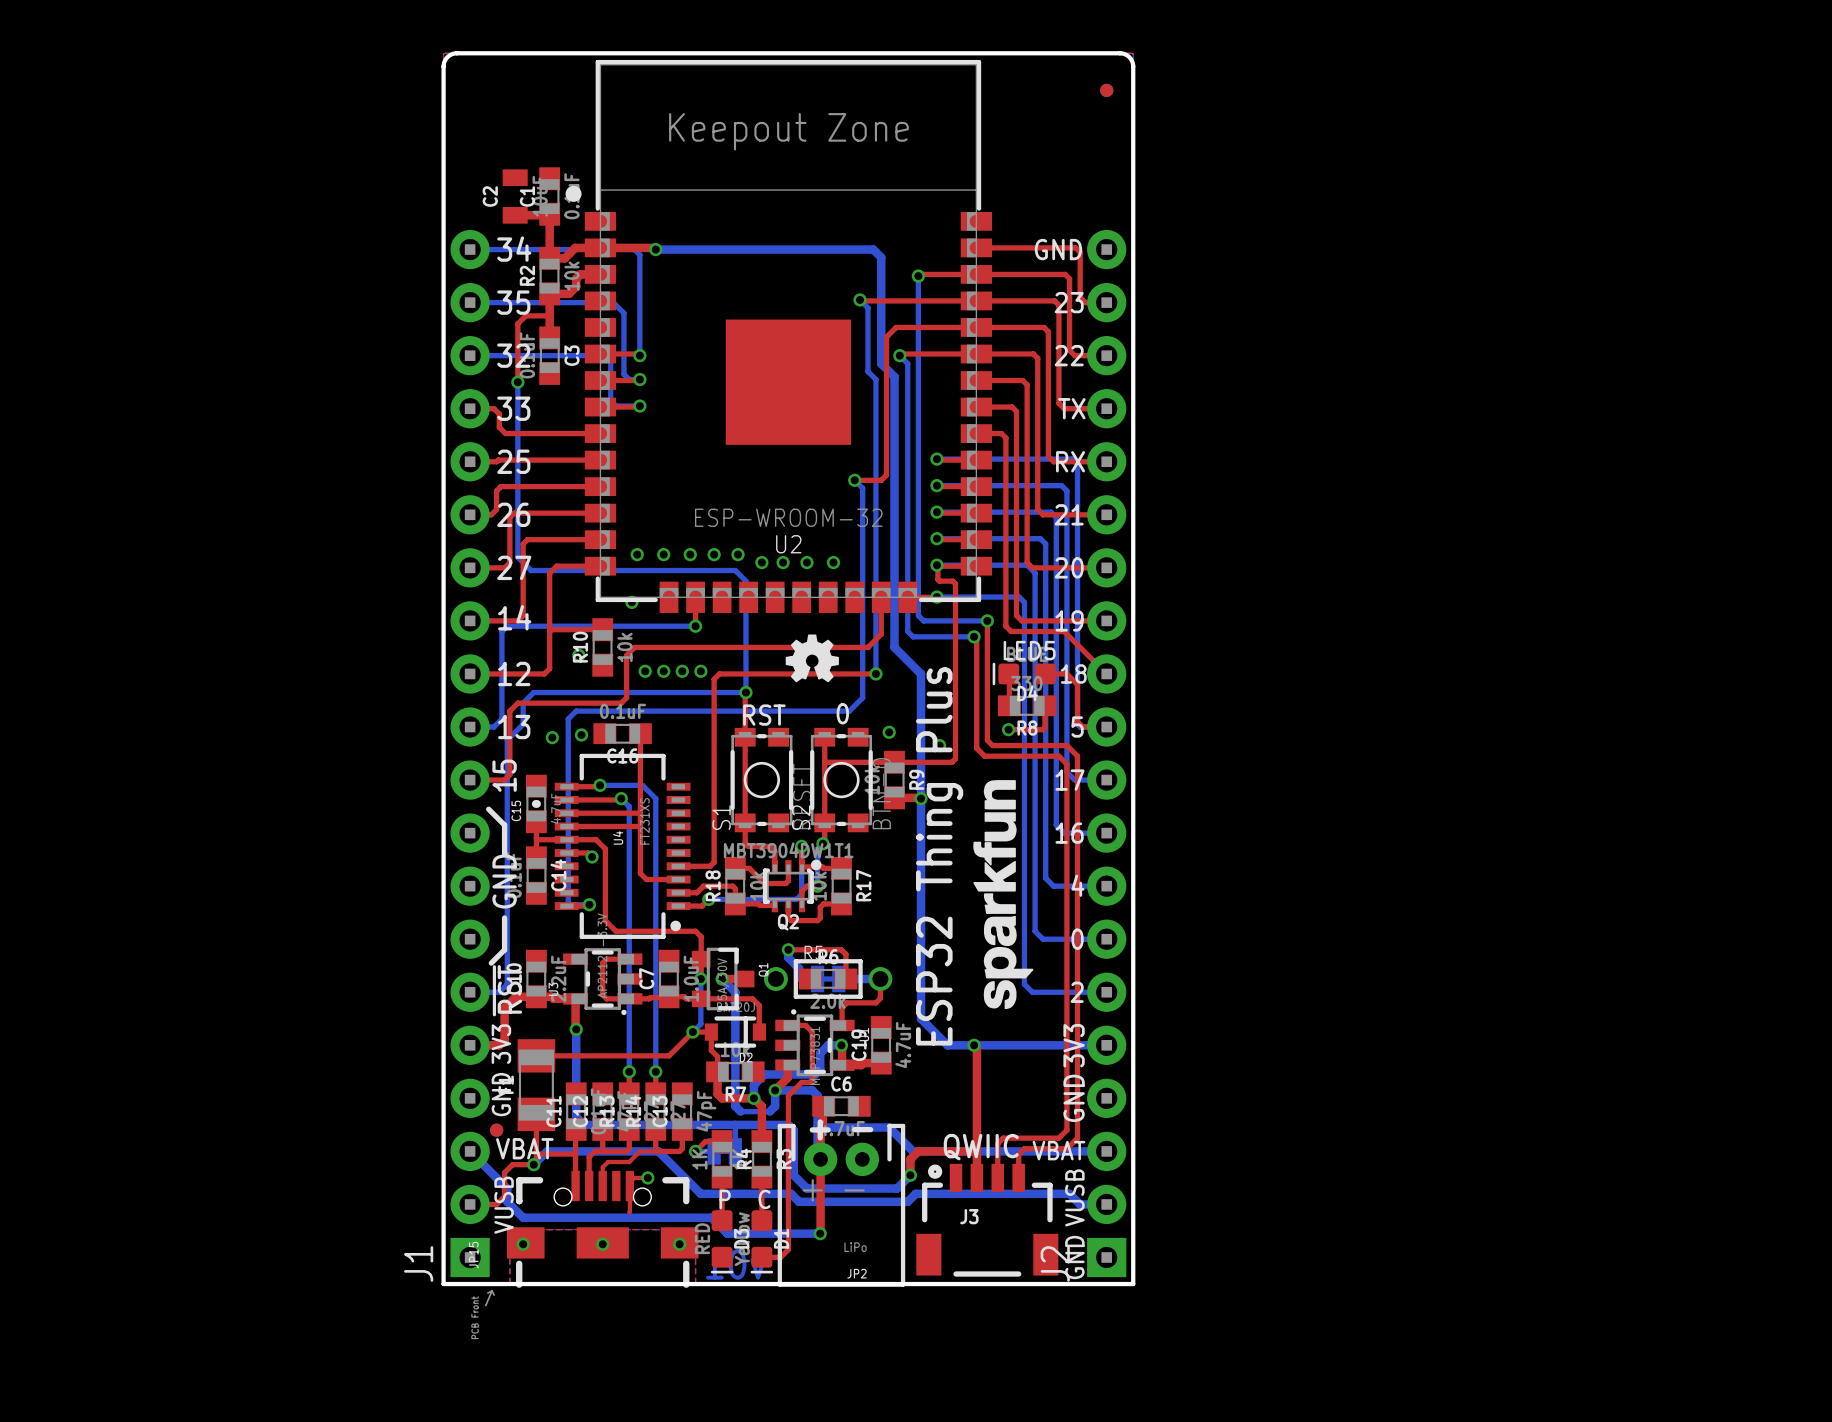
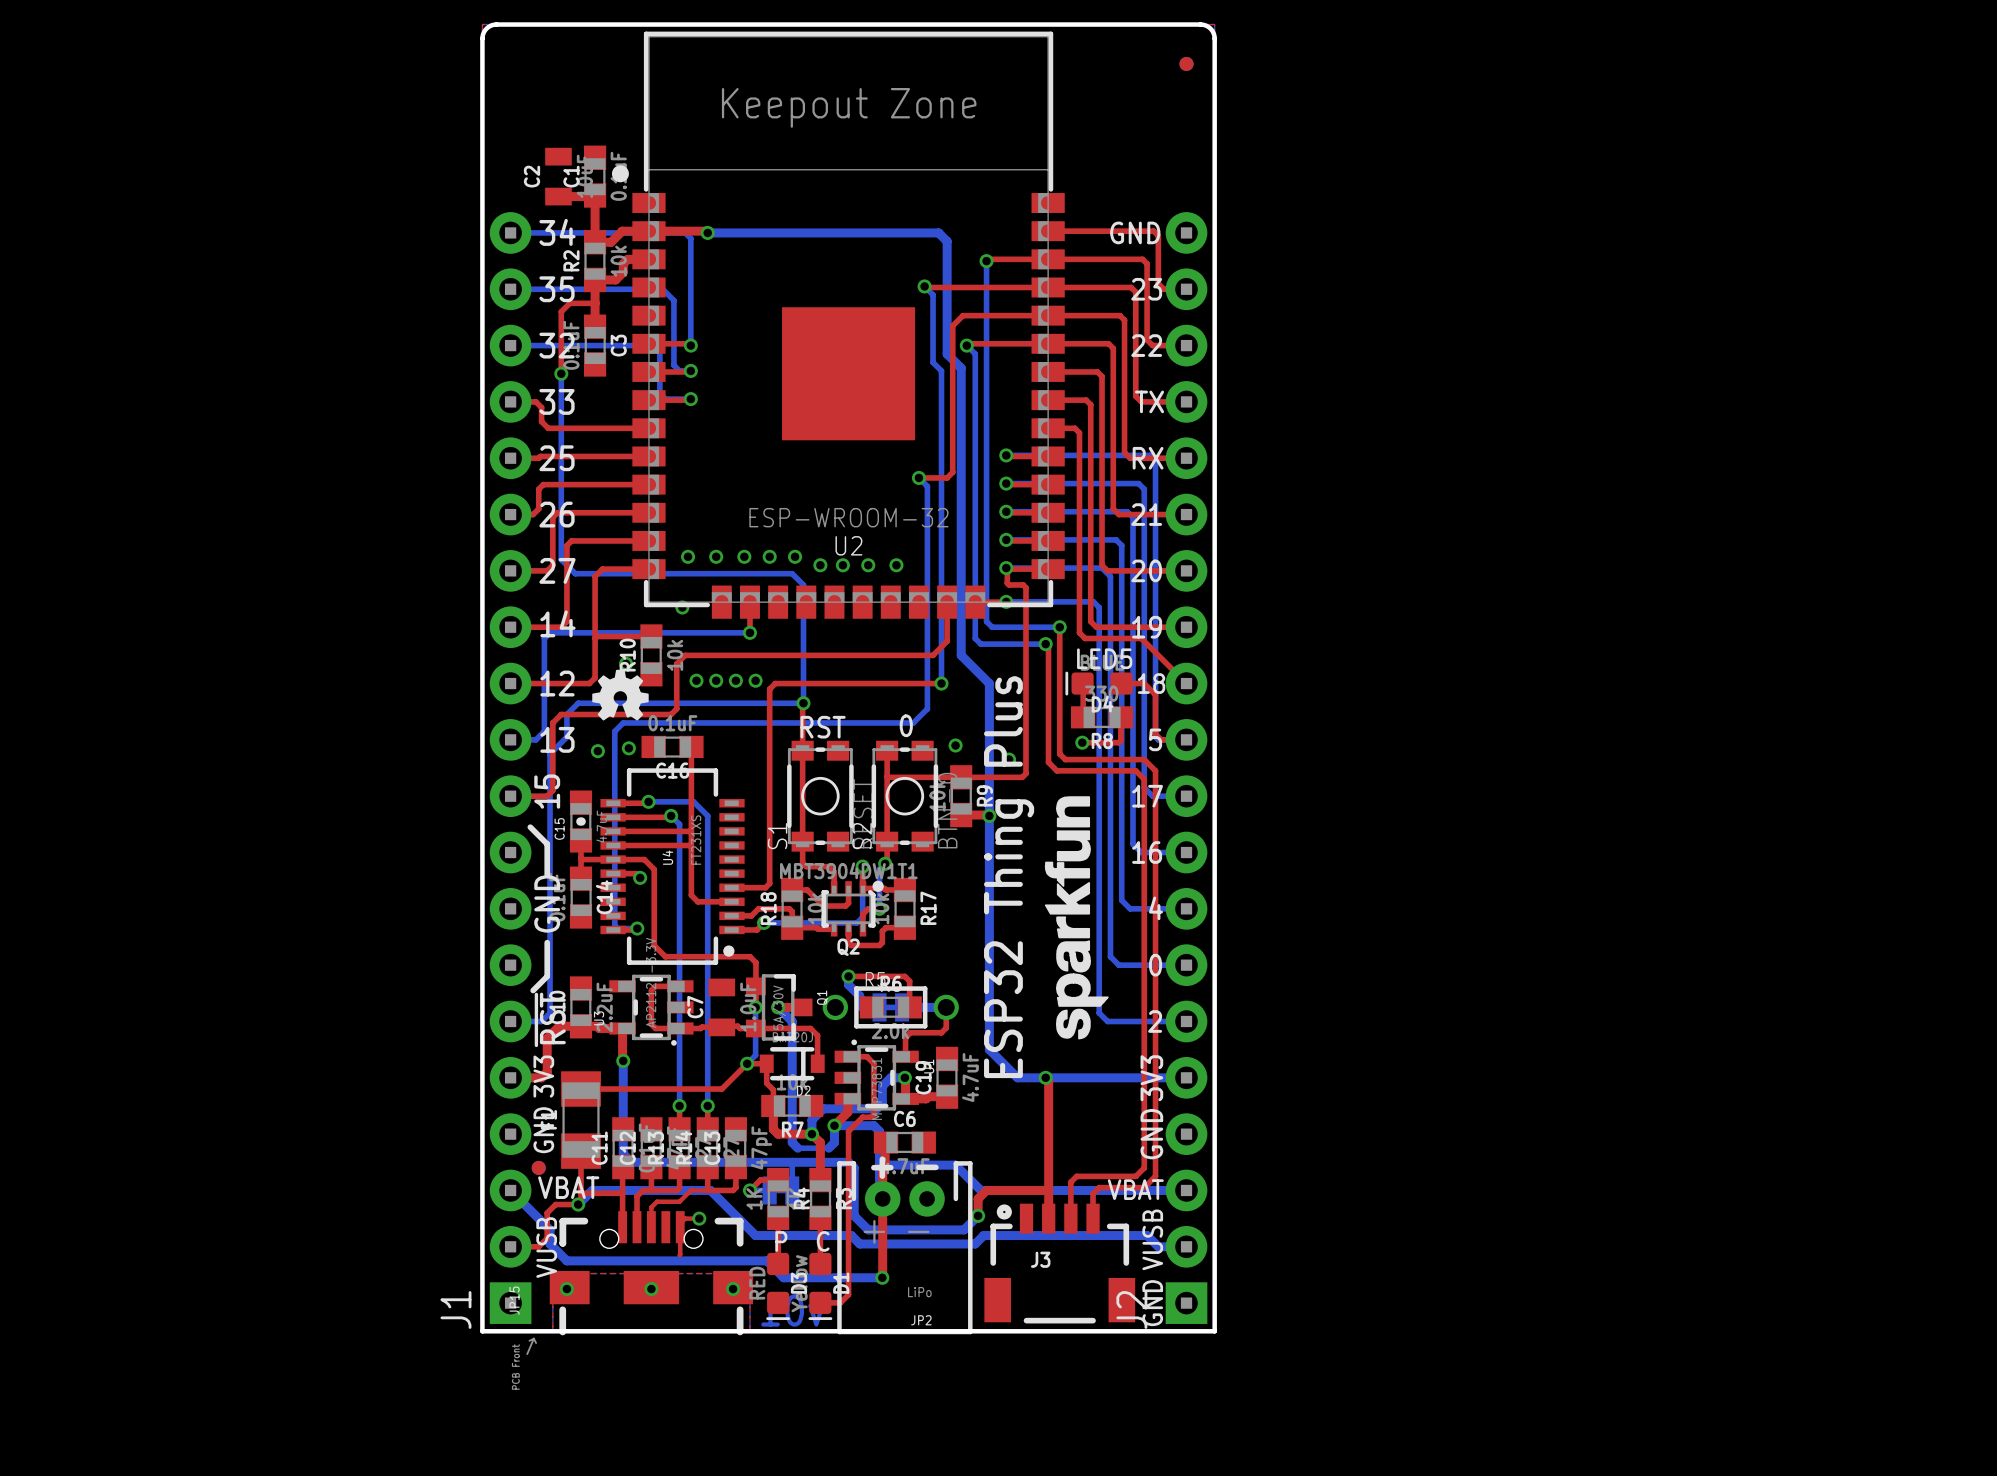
drawing position: (812, 658) -> (620, 695)
C7 footprint: [658, 949, 680, 1009] -> [708, 978, 736, 1037]
text: QWIIC (981, 1147) -> none

